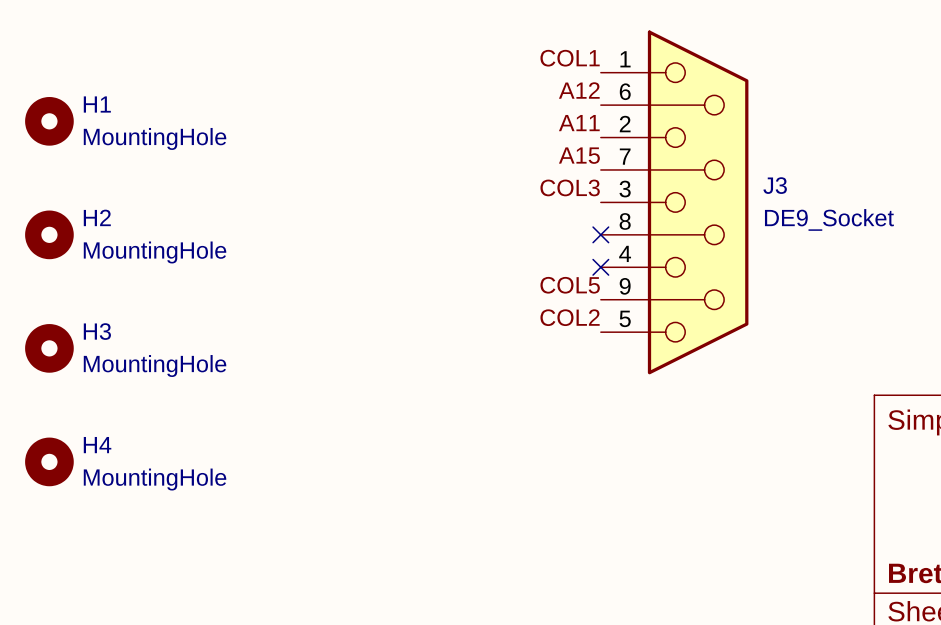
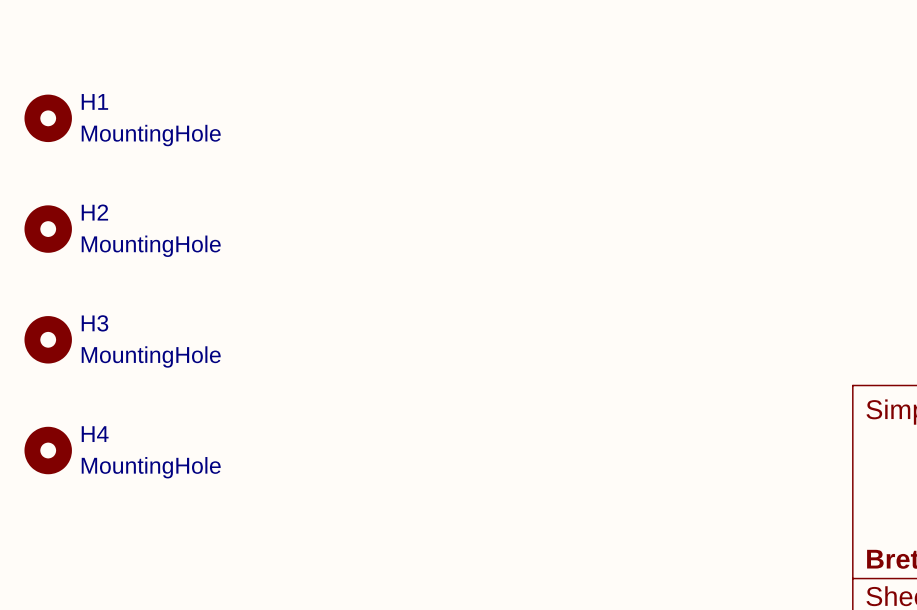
label: COL1 (570, 58) -> none
label: A12 (579, 90) -> none
label: A11 (579, 123) -> none
label: A15 (579, 155) -> none
label: COL3 (570, 187) -> none
J3: DE9_Socket (674, 202) -> none
no-connect mark: (600, 234) -> none
no-connect mark: (600, 267) -> none
label: COL5 (570, 285) -> none
label: COL2 (570, 317) -> none

